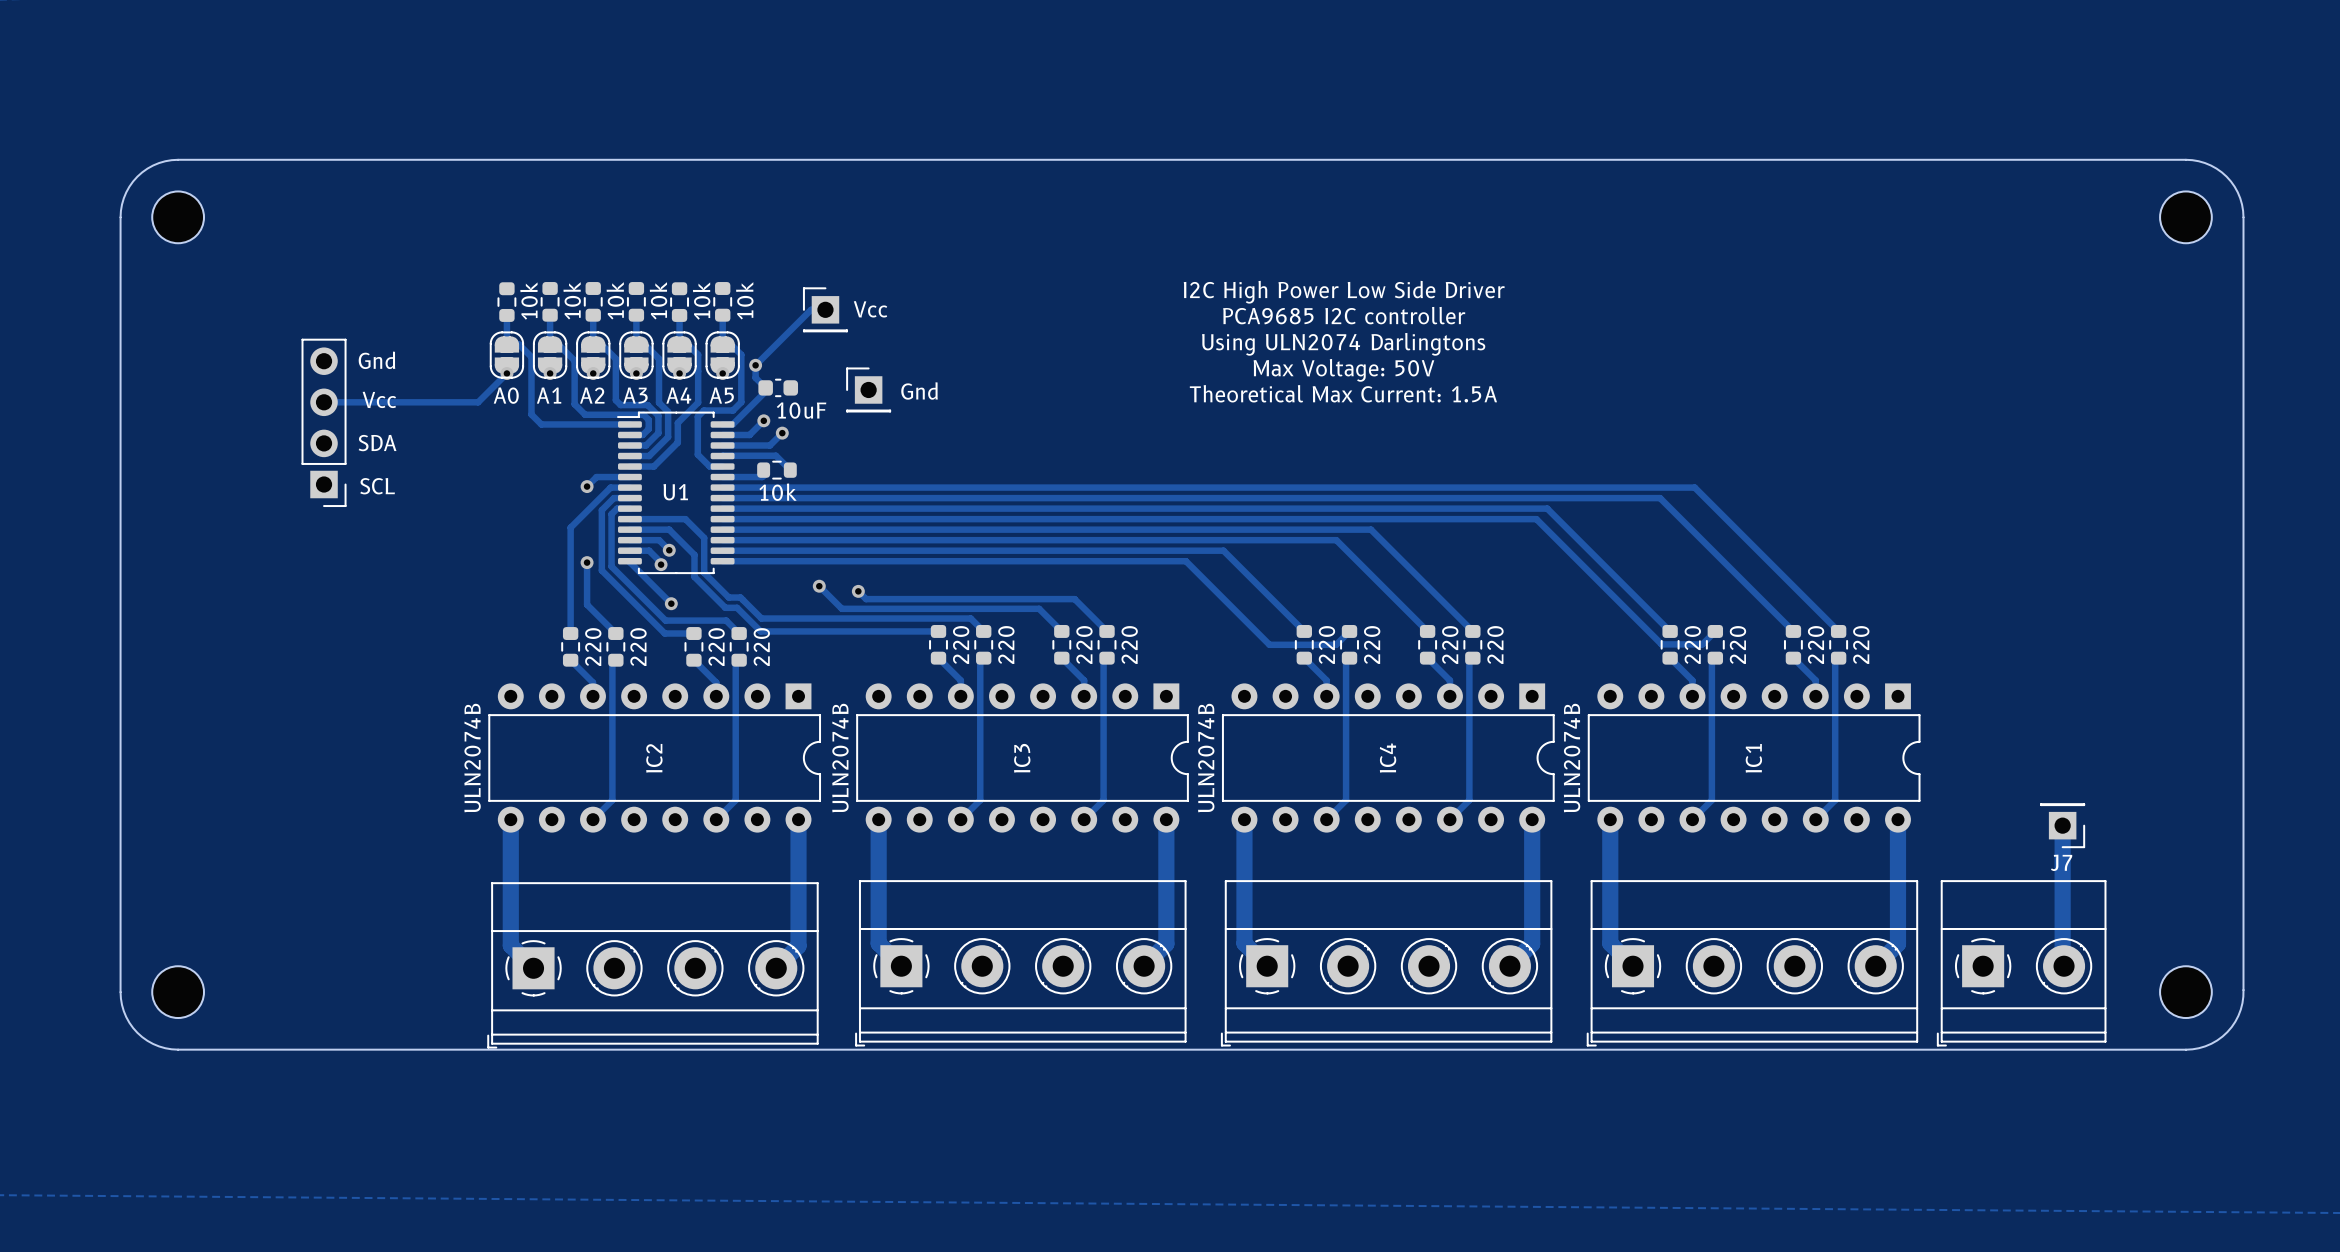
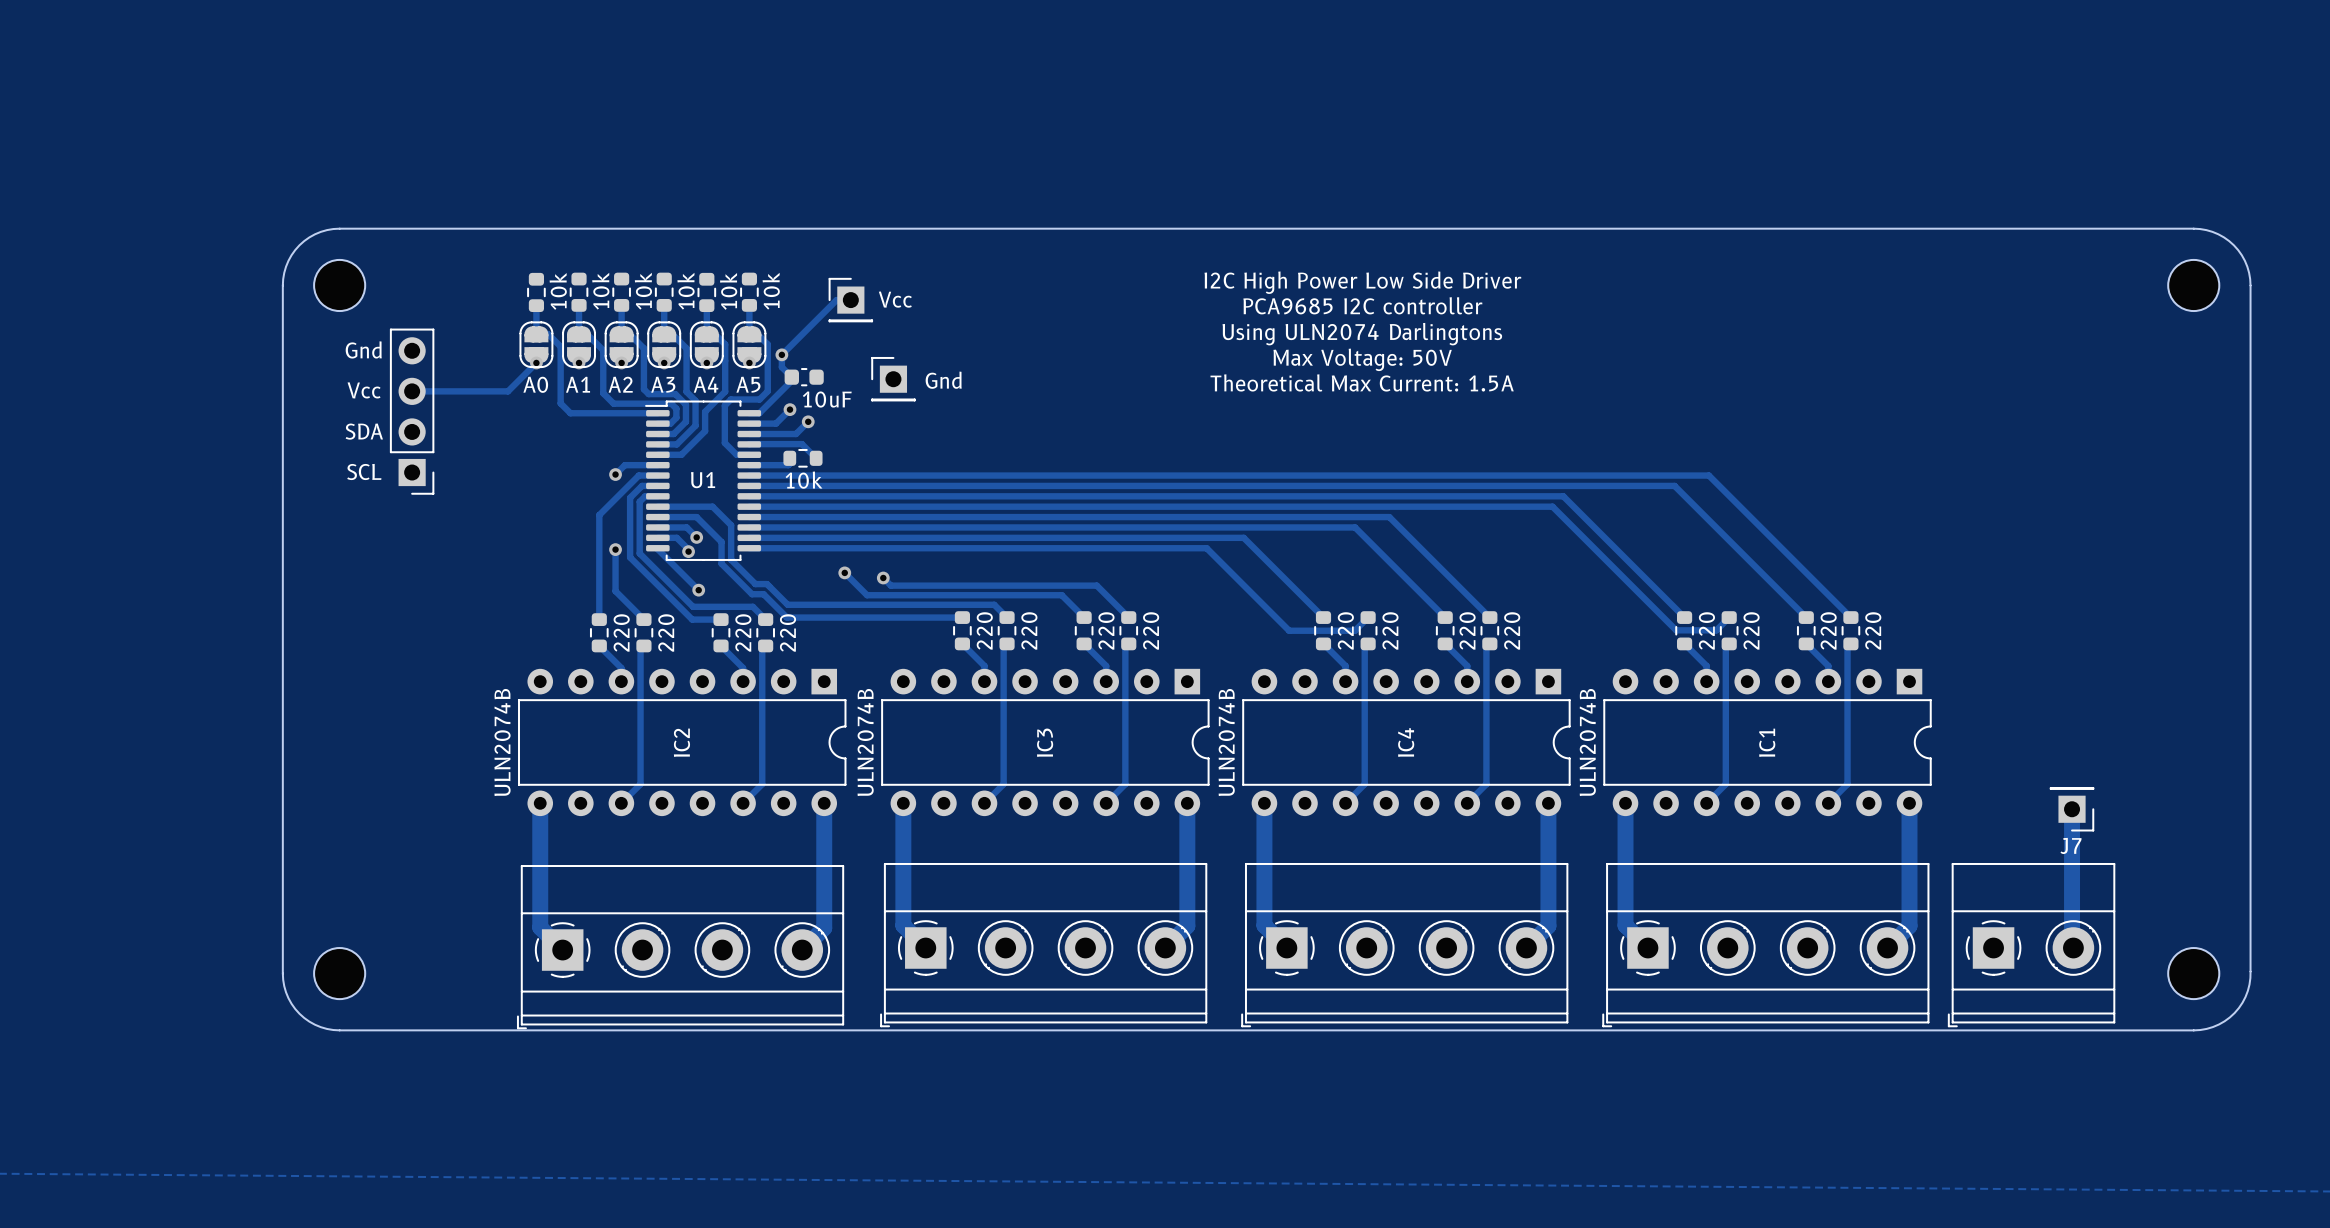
part position: (178, 217) -> (339, 285)
part position: (2185, 217) -> (2193, 285)
board edge: (2243, 295) (2243, 217) (2240, 198) (2230, 181) (2221, 172) (2210, 165) (2192, 160) (178, 159) (159, 163) (142, 172) (129, 186) (123, 198) (120, 217) (120, 998) (126, 1017) (137, 1032) (153, 1043) (165, 1048) (307, 1049) -> (2250, 285) (2244, 260) (2233, 245) (2212, 231) (2193, 228) (339, 228) (320, 231) (304, 241) (295, 250) (286, 266) (282, 285) (282, 973) (286, 992) (299, 1013) (314, 1024) (339, 1030)
text position: Gnd (376, 360) -> Gnd (363, 349)
text position: Vcc (379, 399) -> Vcc (364, 390)
track: (324, 402) (381, 402) -> none
part position: (324, 422) -> (412, 411)
text position: SDA (377, 443) -> SDA (364, 431)
text position: SCL (377, 486) -> SCL (364, 471)
part position: (178, 992) -> (339, 973)

